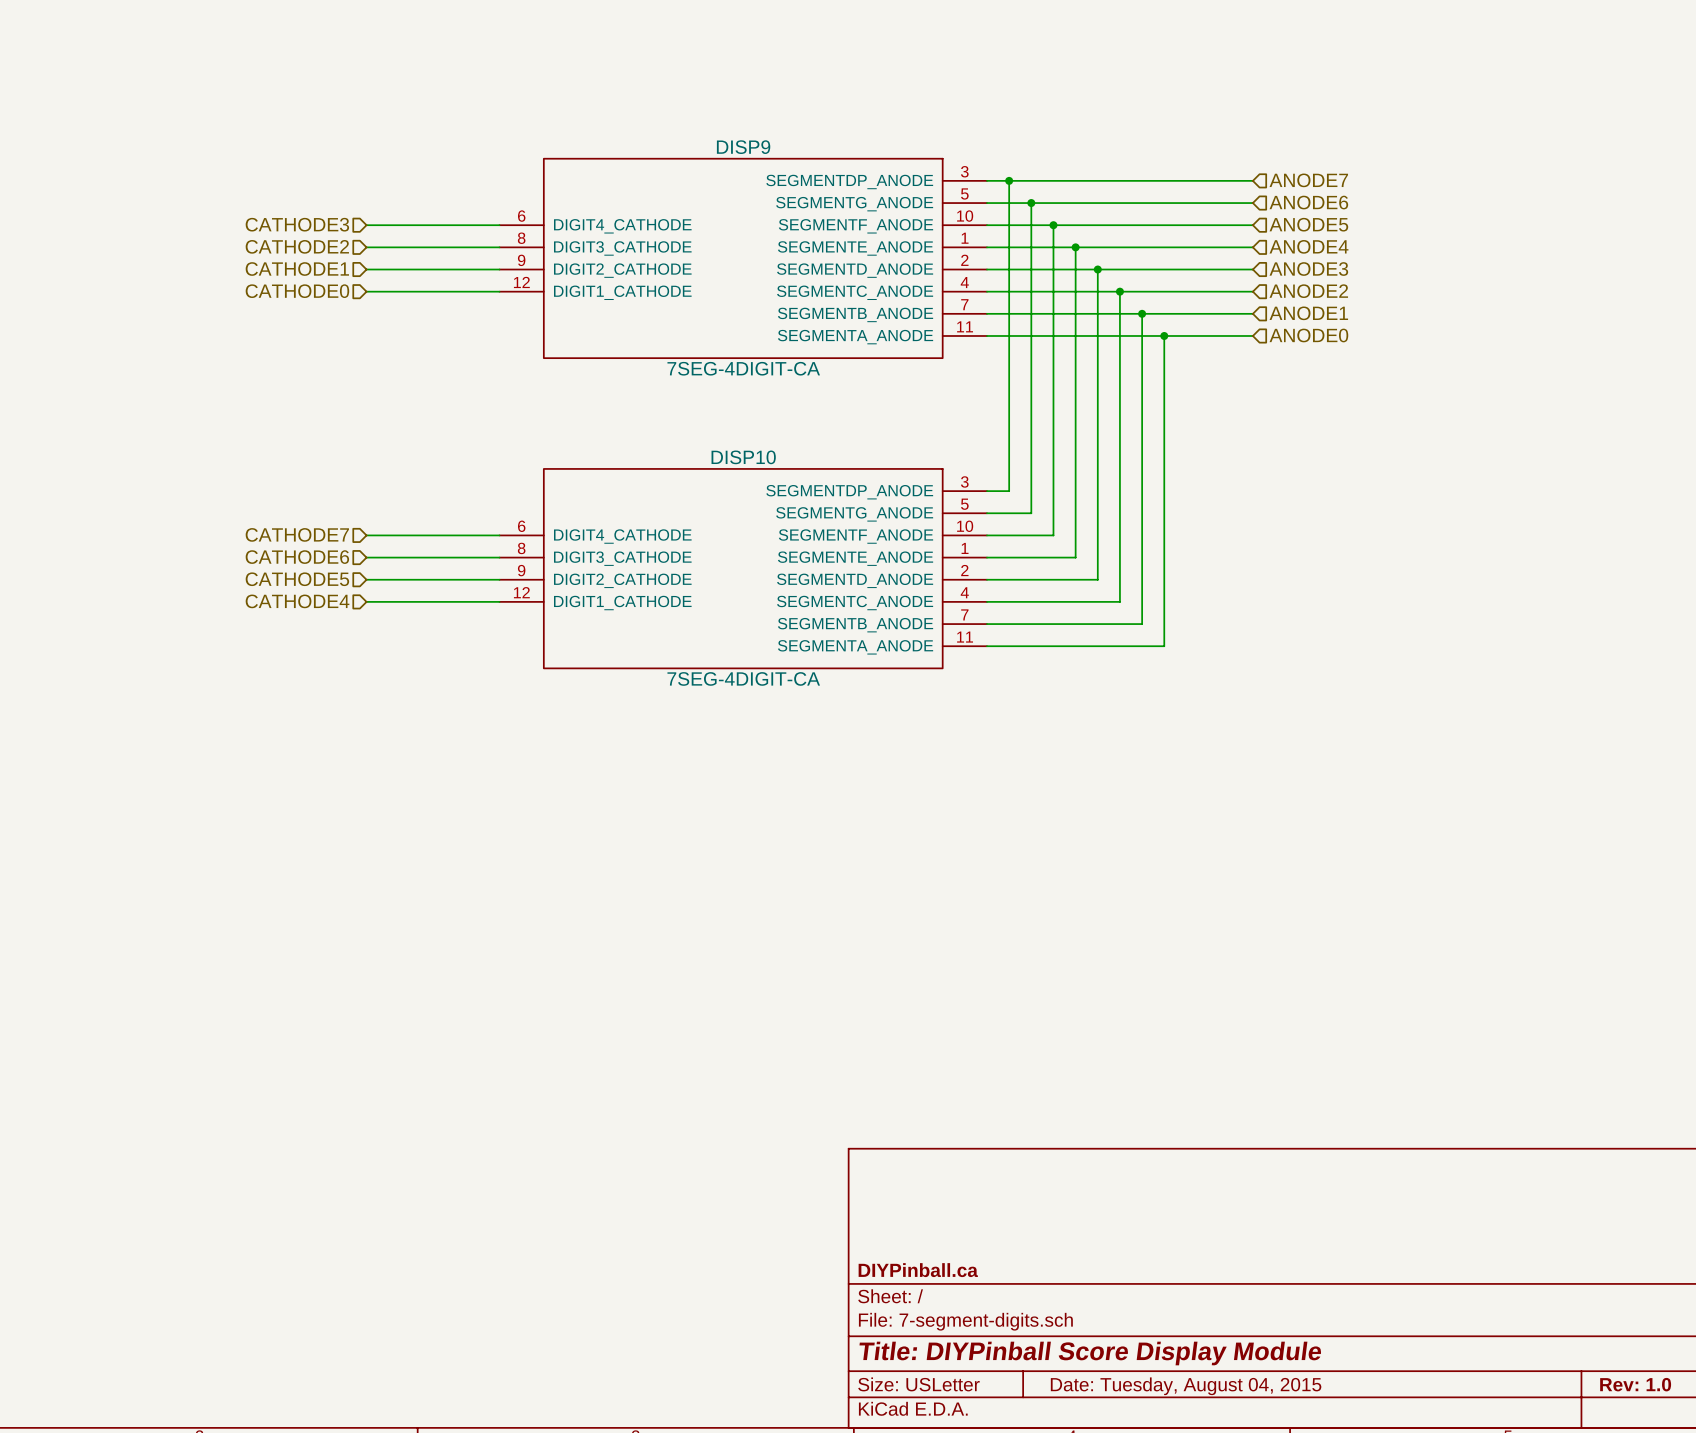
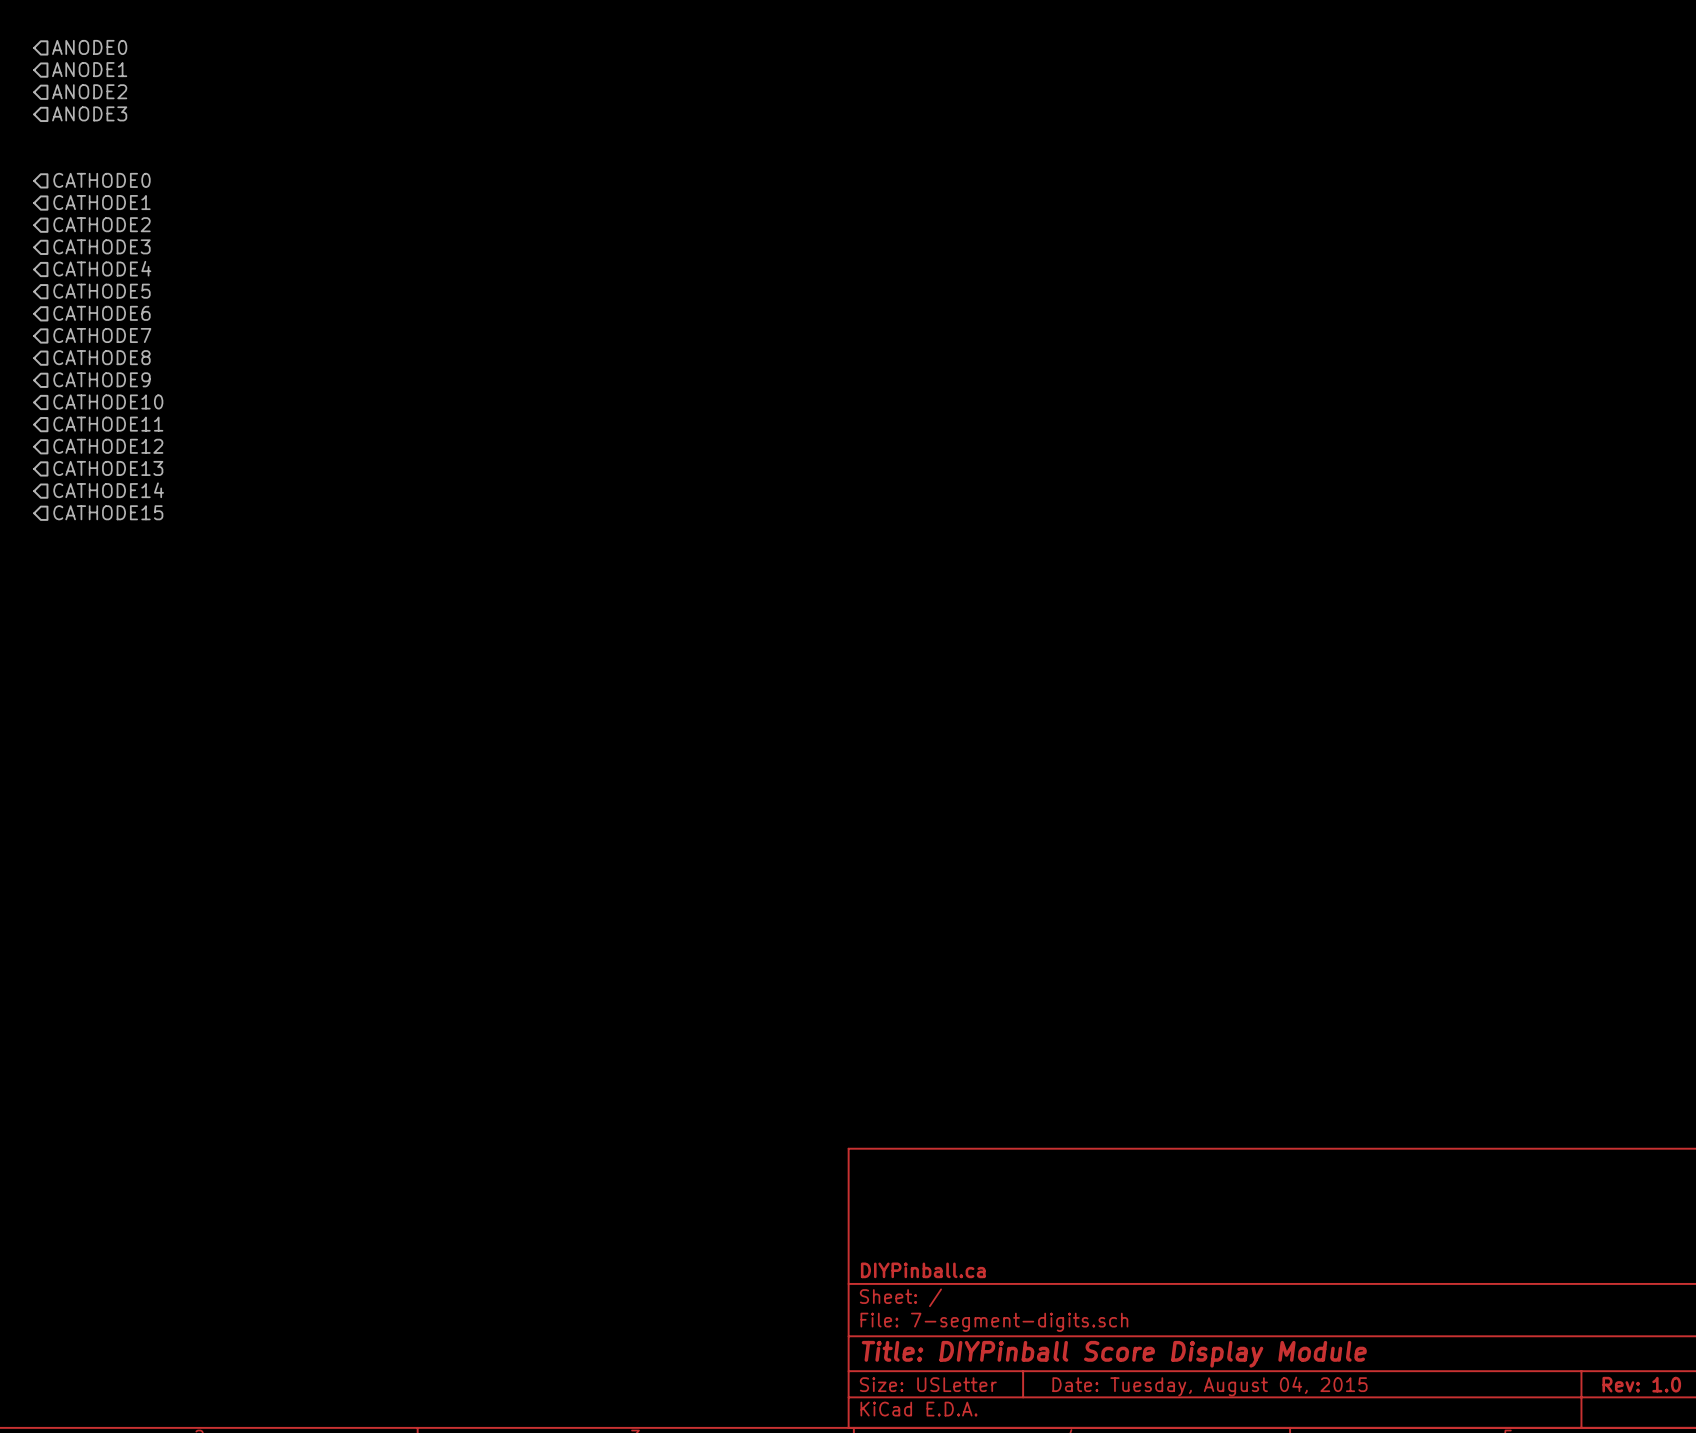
hierarchical label: none -> ANODE0 (89, 47)
hierarchical label: none -> ANODE1 (89, 69)
hierarchical label: none -> ANODE2 (89, 91)
hierarchical label: none -> ANODE3 (89, 113)
hierarchical label: none -> CATHODE0 (101, 180)
wire: (987, 180) (1252, 180) -> none
wire: (1009, 180) (1009, 491) (987, 491) -> none
junction: (1009, 180) -> none
hierarchical label: ANODE7 (1308, 180) -> none
hierarchical label: none -> CATHODE1 (101, 202)
hierarchical label: ANODE6 (1308, 202) -> none
wire: (987, 203) (1252, 203) -> none
wire: (1031, 203) (1031, 513) (987, 513) -> none
junction: (1031, 203) -> none
hierarchical label: none -> CATHODE2 (101, 224)
hierarchical label: CATHODE3 (297, 224) -> none
hierarchical label: ANODE5 (1308, 224) -> none
wire: (366, 225) (499, 225) -> none
wire: (987, 225) (1252, 225) -> none
wire: (1053, 225) (1053, 535) (987, 535) -> none
junction: (1053, 225) -> none
hierarchical label: none -> CATHODE3 (101, 246)
hierarchical label: CATHODE2 (297, 246) -> none
hierarchical label: ANODE4 (1309, 246) -> none
wire: (366, 247) (499, 247) -> none
wire: (987, 247) (1252, 247) -> none
wire: (1075, 247) (1075, 557) (987, 557) -> none
junction: (1075, 247) -> none
DISP9: 7SEG-4DIGIT-CA (743, 258) -> none
hierarchical label: none -> CATHODE4 (102, 268)
hierarchical label: CATHODE1 (297, 269) -> none
wire: (366, 269) (499, 269) -> none
wire: (987, 269) (1252, 269) -> none
wire: (1097, 269) (1097, 579) (987, 579) -> none
junction: (1097, 269) -> none
hierarchical label: ANODE3 (1308, 269) -> none
hierarchical label: none -> CATHODE5 (101, 291)
hierarchical label: CATHODE0 (297, 291) -> none
wire: (366, 291) (499, 291) -> none
wire: (987, 291) (1252, 291) -> none
wire: (1119, 291) (1119, 601) (987, 601) -> none
junction: (1119, 291) -> none
hierarchical label: ANODE2 (1308, 291) -> none
hierarchical label: none -> CATHODE6 (101, 313)
wire: (987, 313) (1252, 313) -> none
wire: (1142, 313) (1142, 624) (987, 624) -> none
junction: (1142, 313) -> none
hierarchical label: ANODE1 (1308, 313) -> none
hierarchical label: none -> CATHODE7 (102, 335)
wire: (987, 335) (1252, 335) -> none
wire: (1164, 335) (1164, 646) (987, 646) -> none
junction: (1164, 335) -> none
hierarchical label: ANODE0 (1308, 335) -> none
hierarchical label: none -> CATHODE8 (101, 357)
hierarchical label: none -> CATHODE9 (101, 379)
hierarchical label: none -> CATHODE10 (108, 401)
hierarchical label: none -> CATHODE11 (108, 424)
hierarchical label: none -> CATHODE12 (108, 446)
hierarchical label: none -> CATHODE13 (108, 468)
hierarchical label: none -> CATHODE14 (108, 490)
hierarchical label: none -> CATHODE15 (108, 512)
hierarchical label: CATHODE7 (297, 534) -> none
wire: (366, 535) (499, 535) -> none
hierarchical label: CATHODE6 (297, 557) -> none
wire: (366, 557) (499, 557) -> none
DISP10: 7SEG-4DIGIT-CA (743, 568) -> none
hierarchical label: CATHODE5 (297, 579) -> none
wire: (366, 579) (499, 579) -> none
hierarchical label: CATHODE4 (297, 601) -> none
wire: (366, 601) (499, 601) -> none

